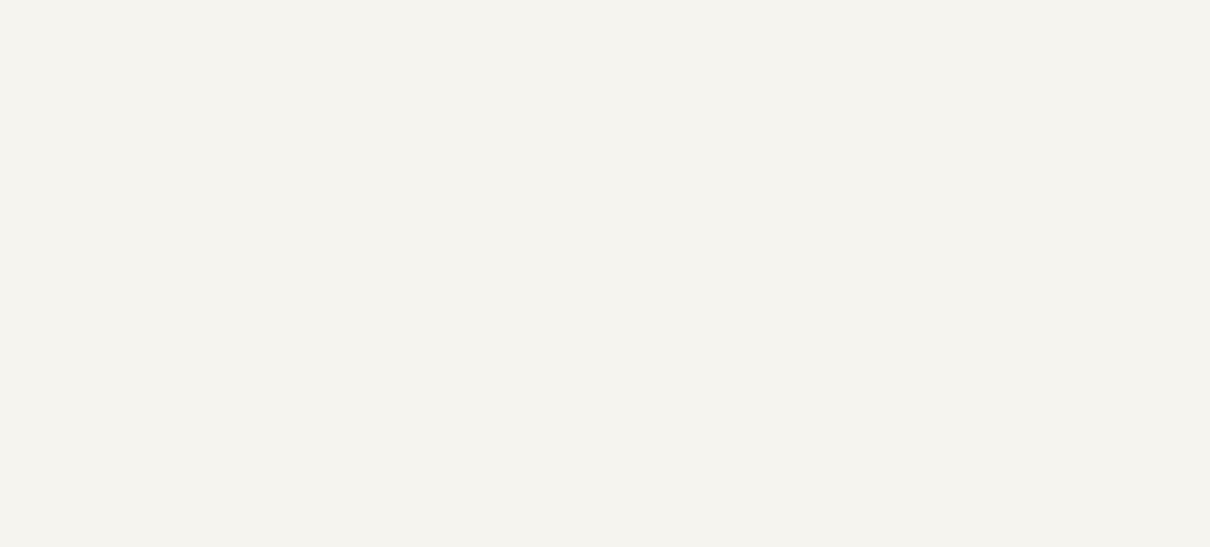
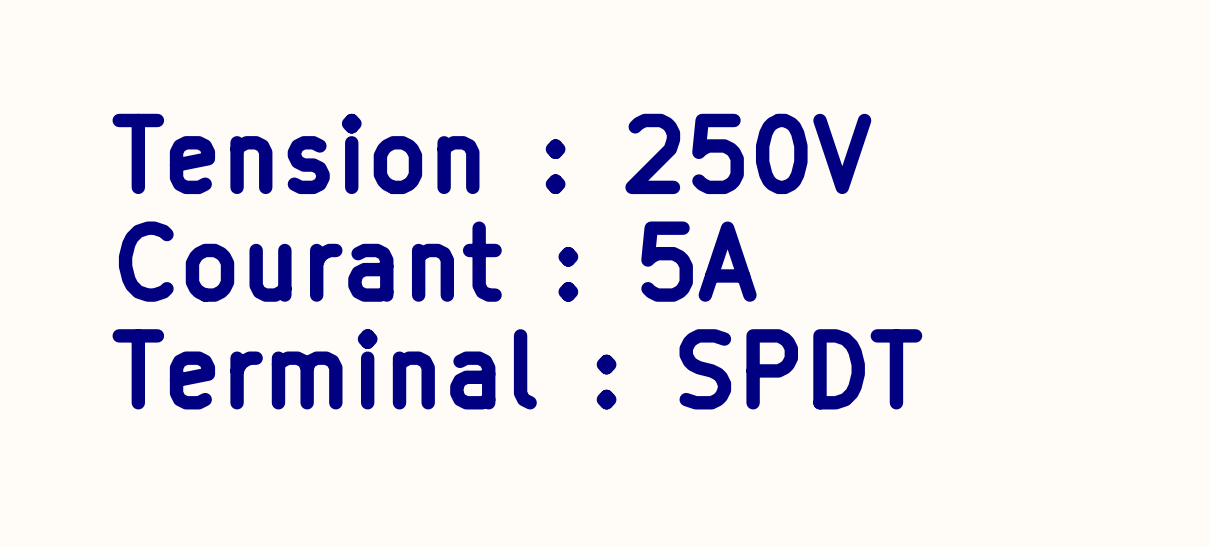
text: none -> Tension : 250V (491, 153)
text: none -> Courant : 5A (437, 261)
text: none -> Terminal : SPDT (517, 369)

